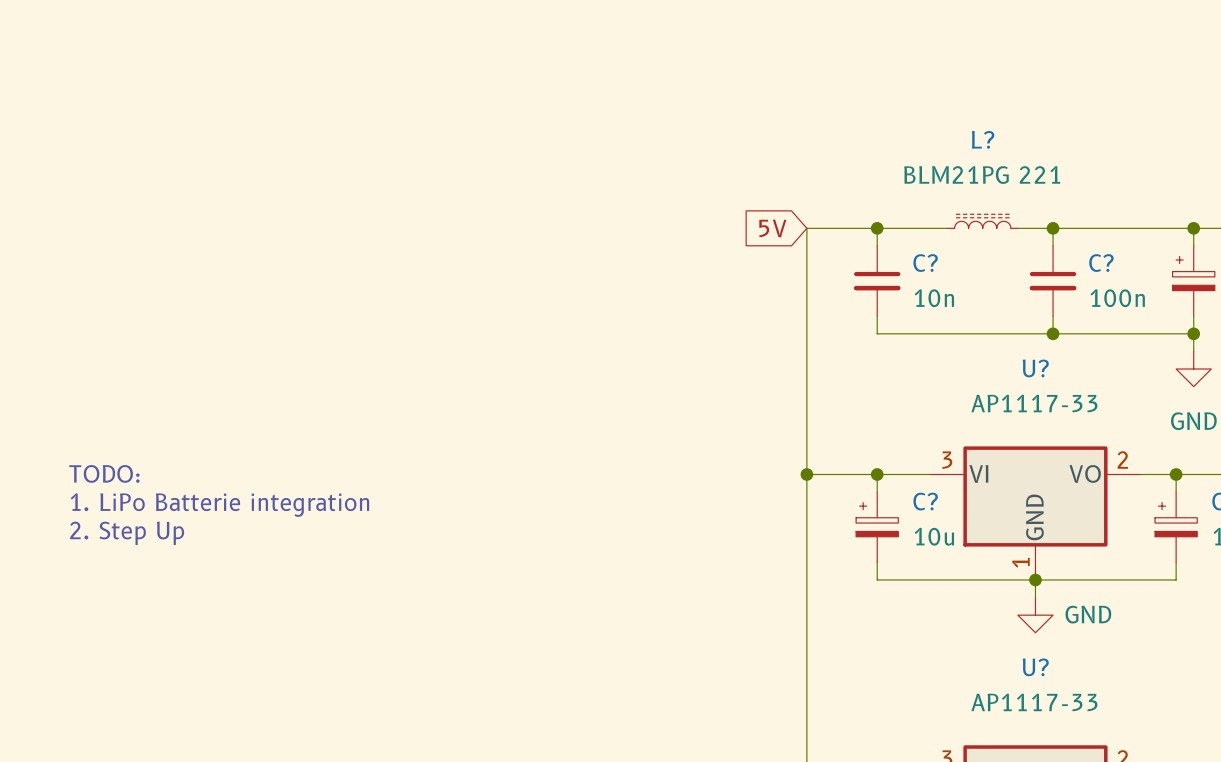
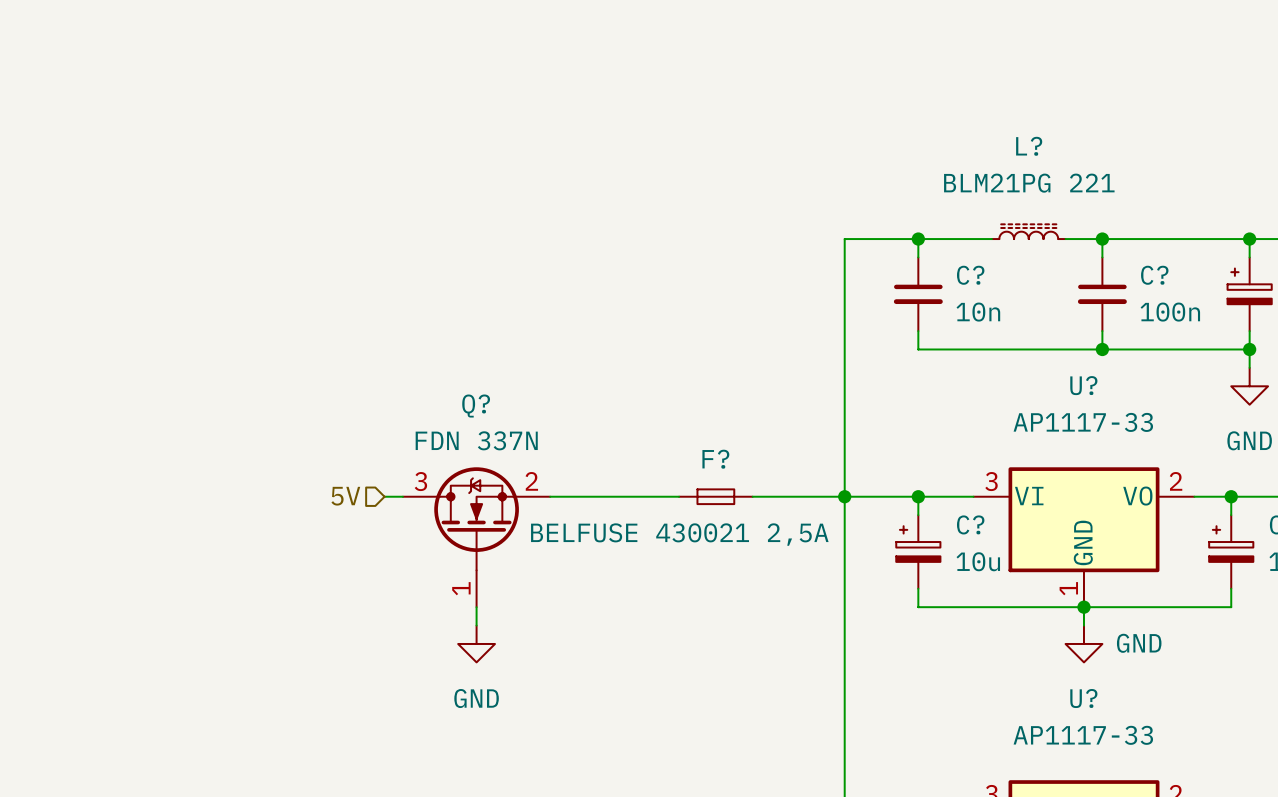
global label: 5V (772, 228) -> none
text: TODO: (104, 473) -> none
hierarchical label: none -> 5V (345, 496)
wire: none -> (384, 496) (402, 496)
wire: none -> (550, 496) (679, 496)
F?: none -> BELFUSE 430021 2,5A (715, 496)
wire: none -> (752, 496) (844, 496)
text: 1. LiPo Batterie integration (219, 505) -> none
Q?: none -> FDN 337N (476, 537)
text: 2. Step Up (127, 533) -> none
wire: none -> (476, 607) (476, 625)
power symbol: none -> GND (476, 643)

